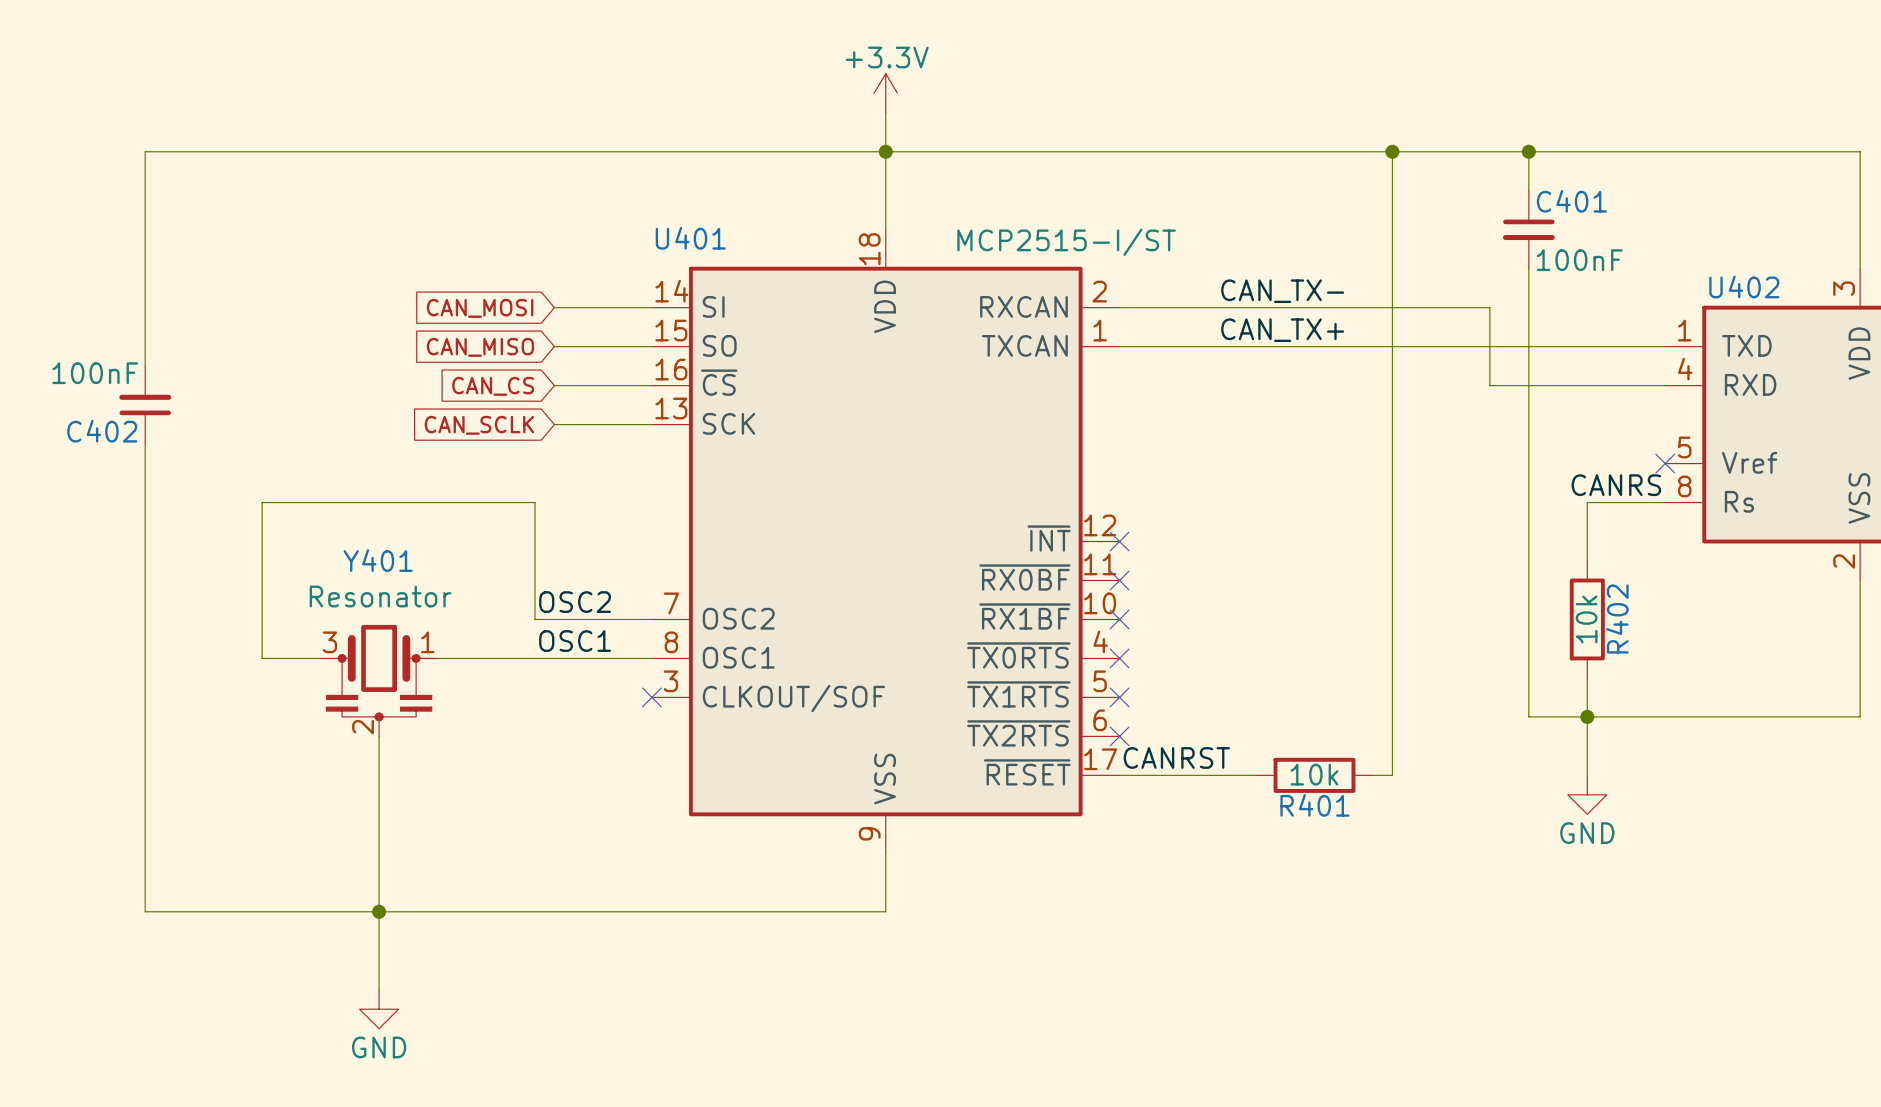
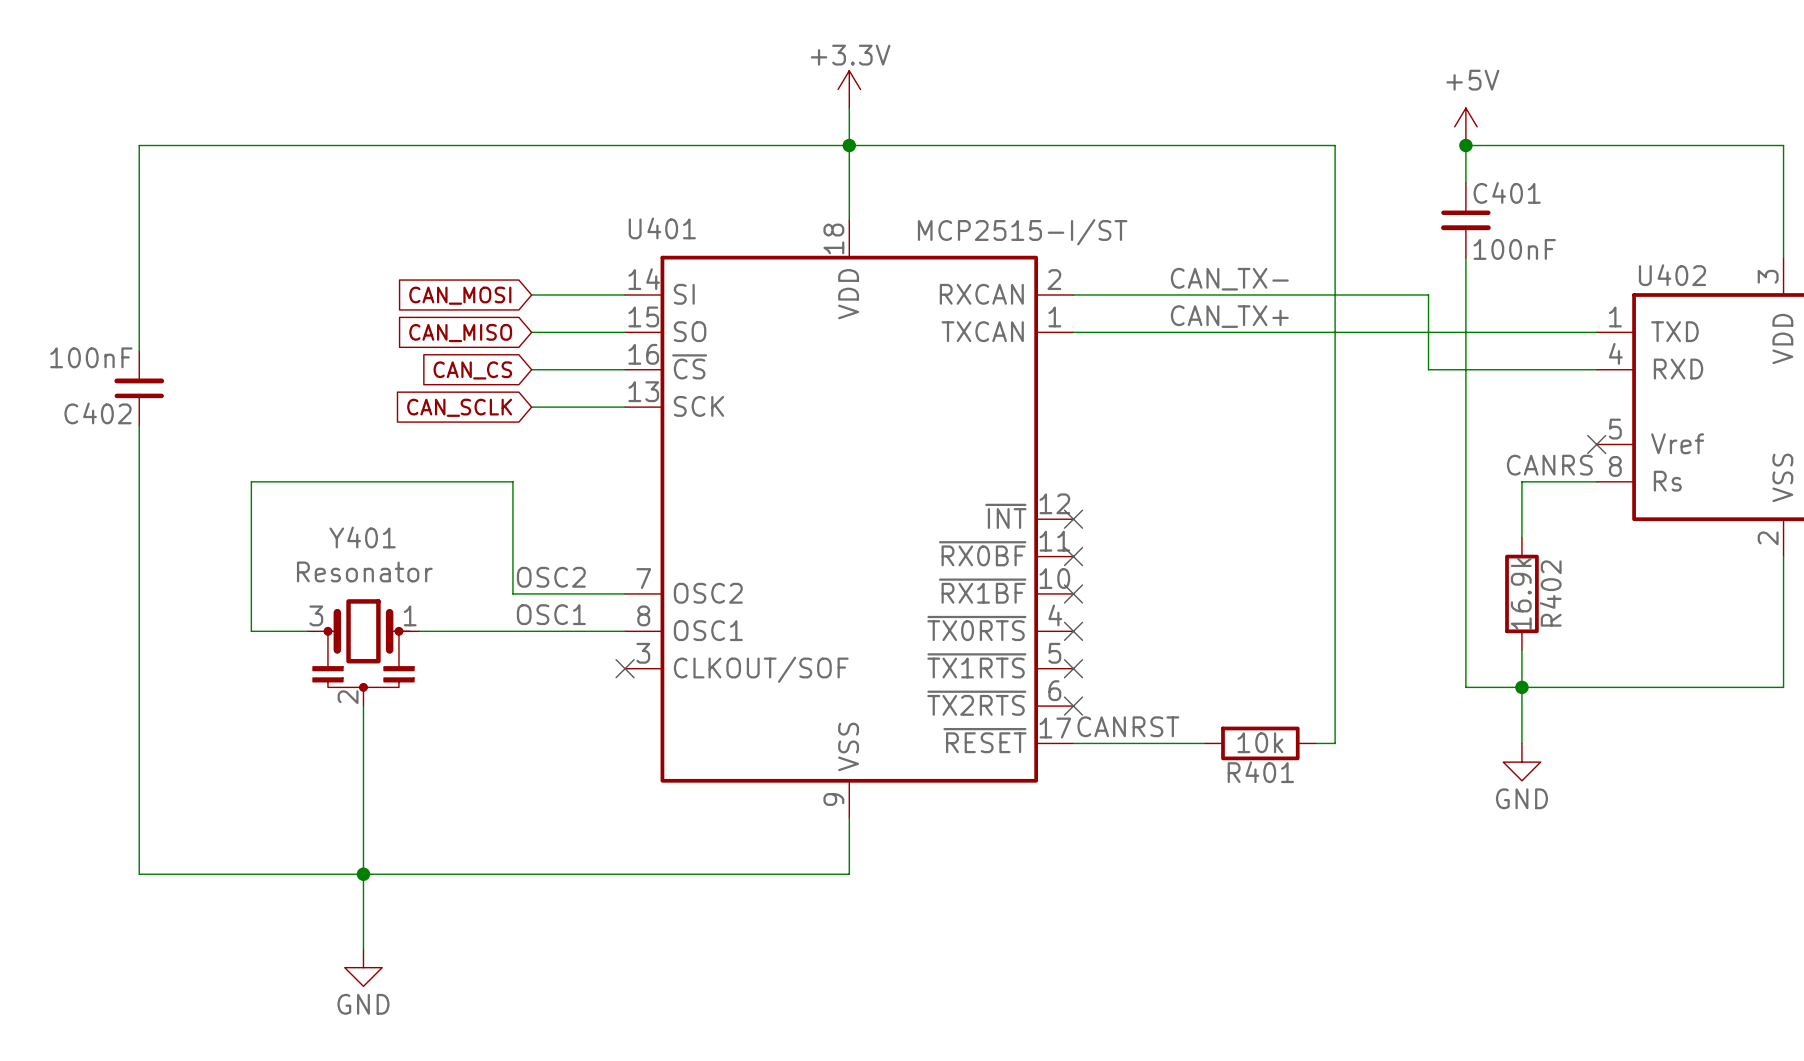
power symbol: none -> +5V (1465, 126)
wire: (1392, 151) (1528, 151) -> none
junction: (1392, 151) -> none
R402 value: 10k (1586, 619) -> 16.9k (1521, 593)

